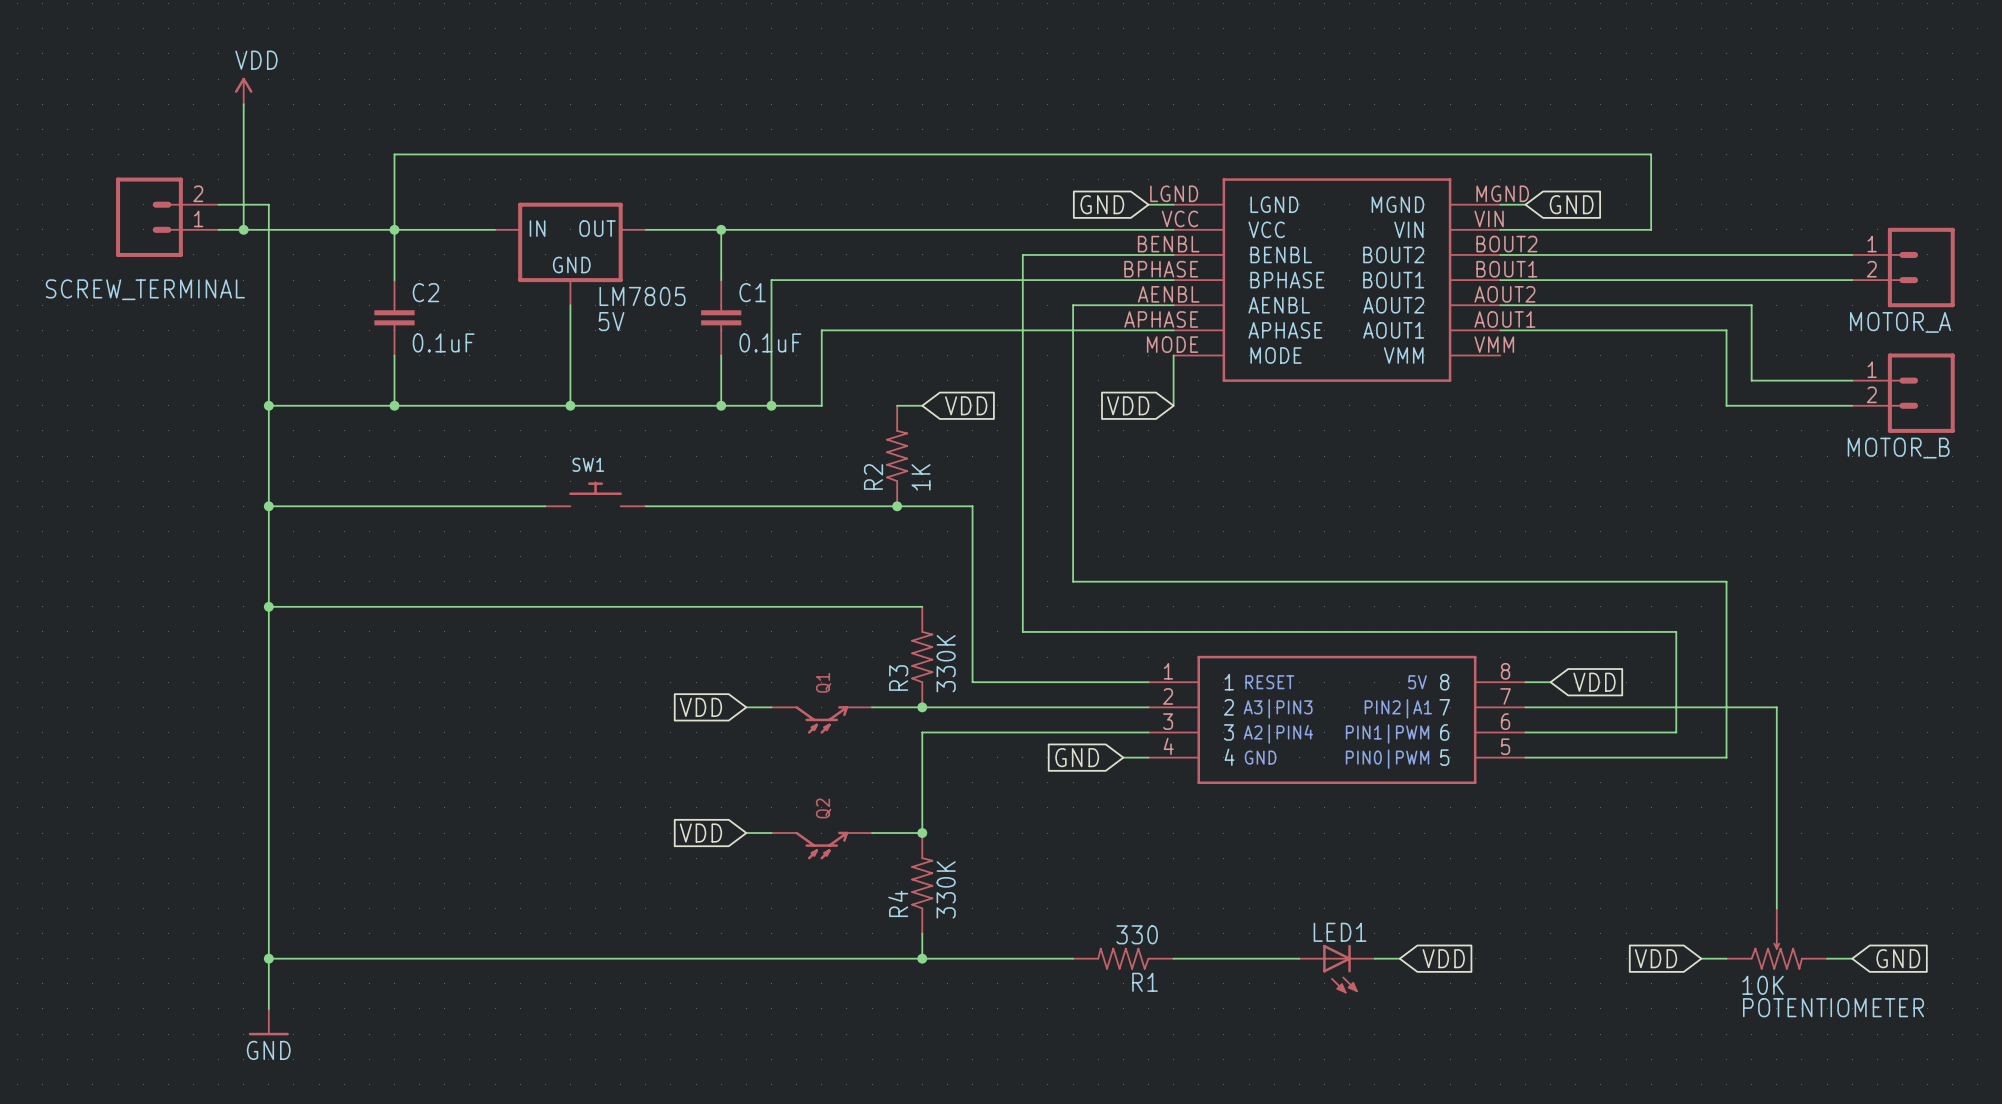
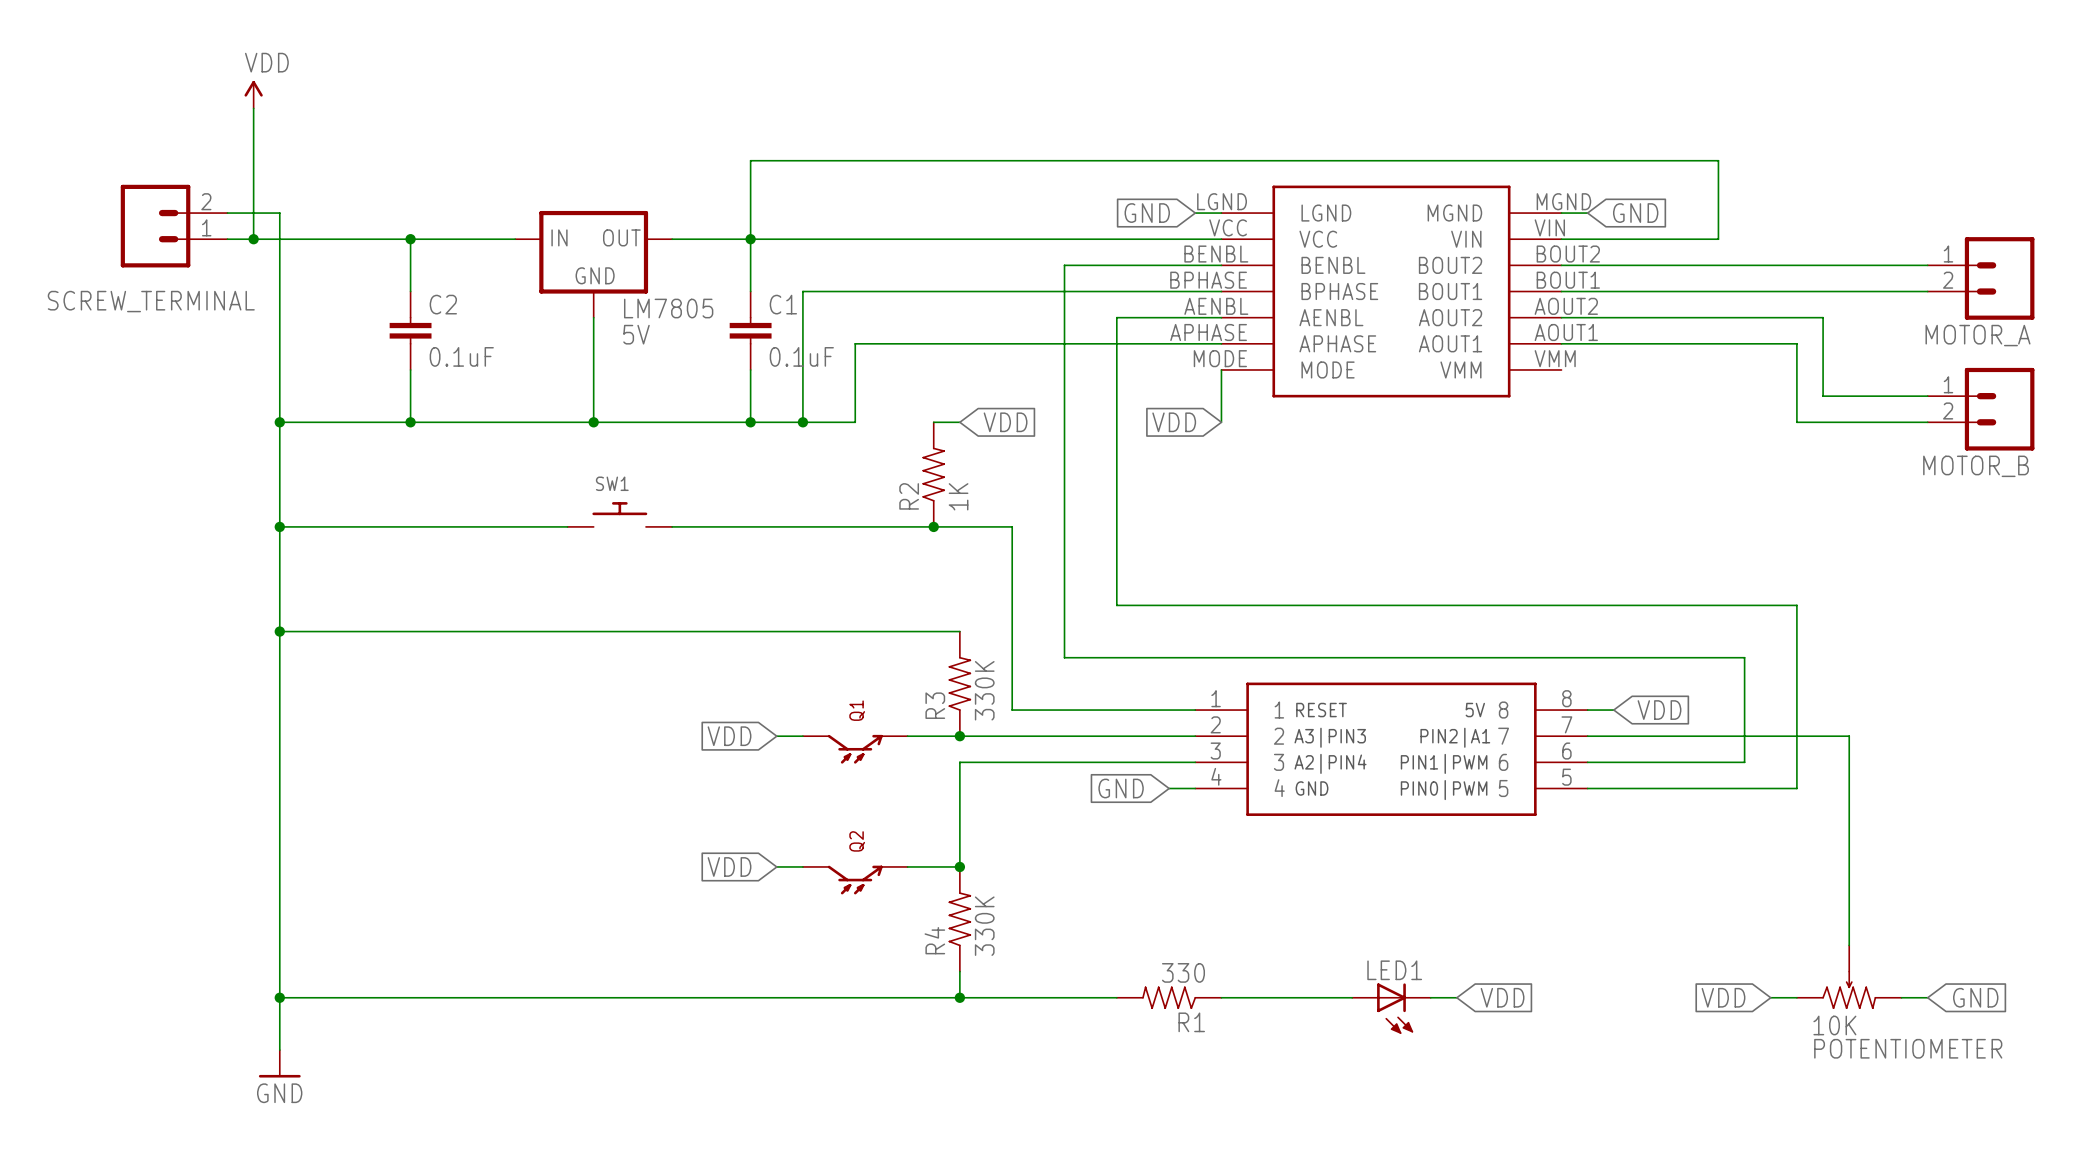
wire: (721, 154) (394, 154) (394, 229) -> (750, 160) (750, 239)

